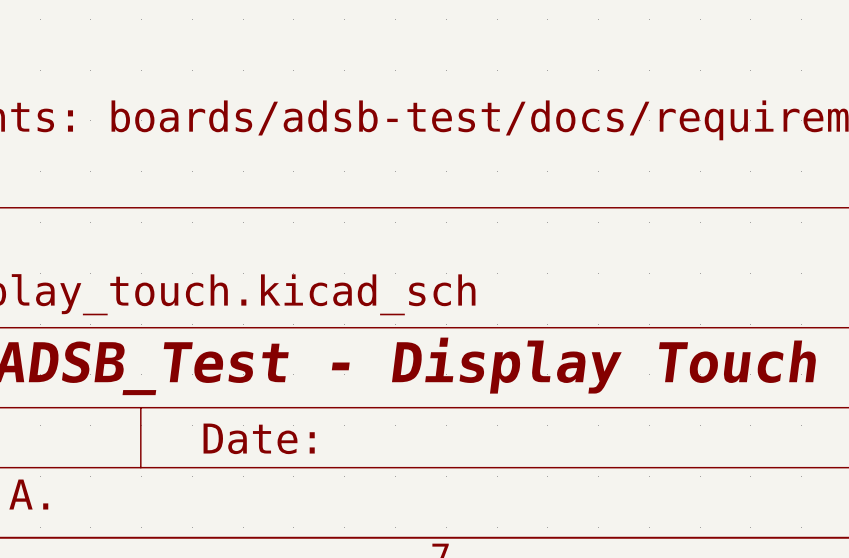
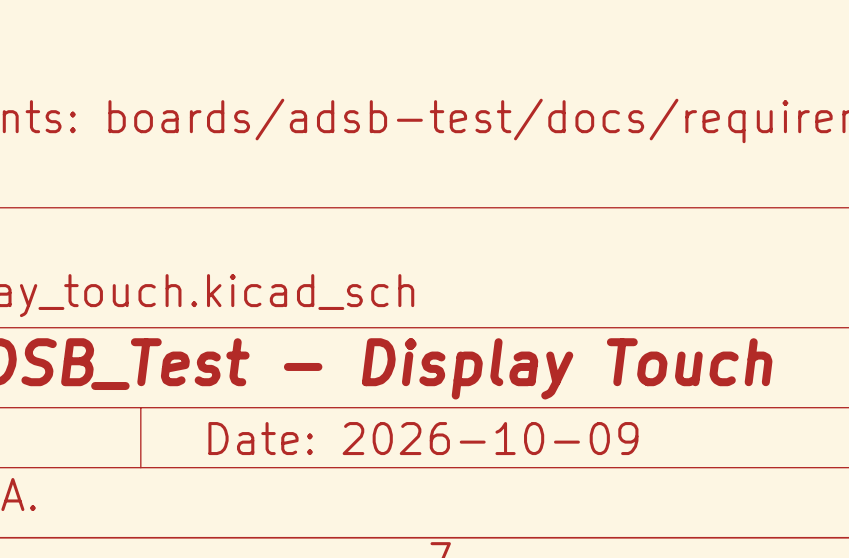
title block: Date: (259, 438) -> Date: 2026-10-09 (423, 438)

